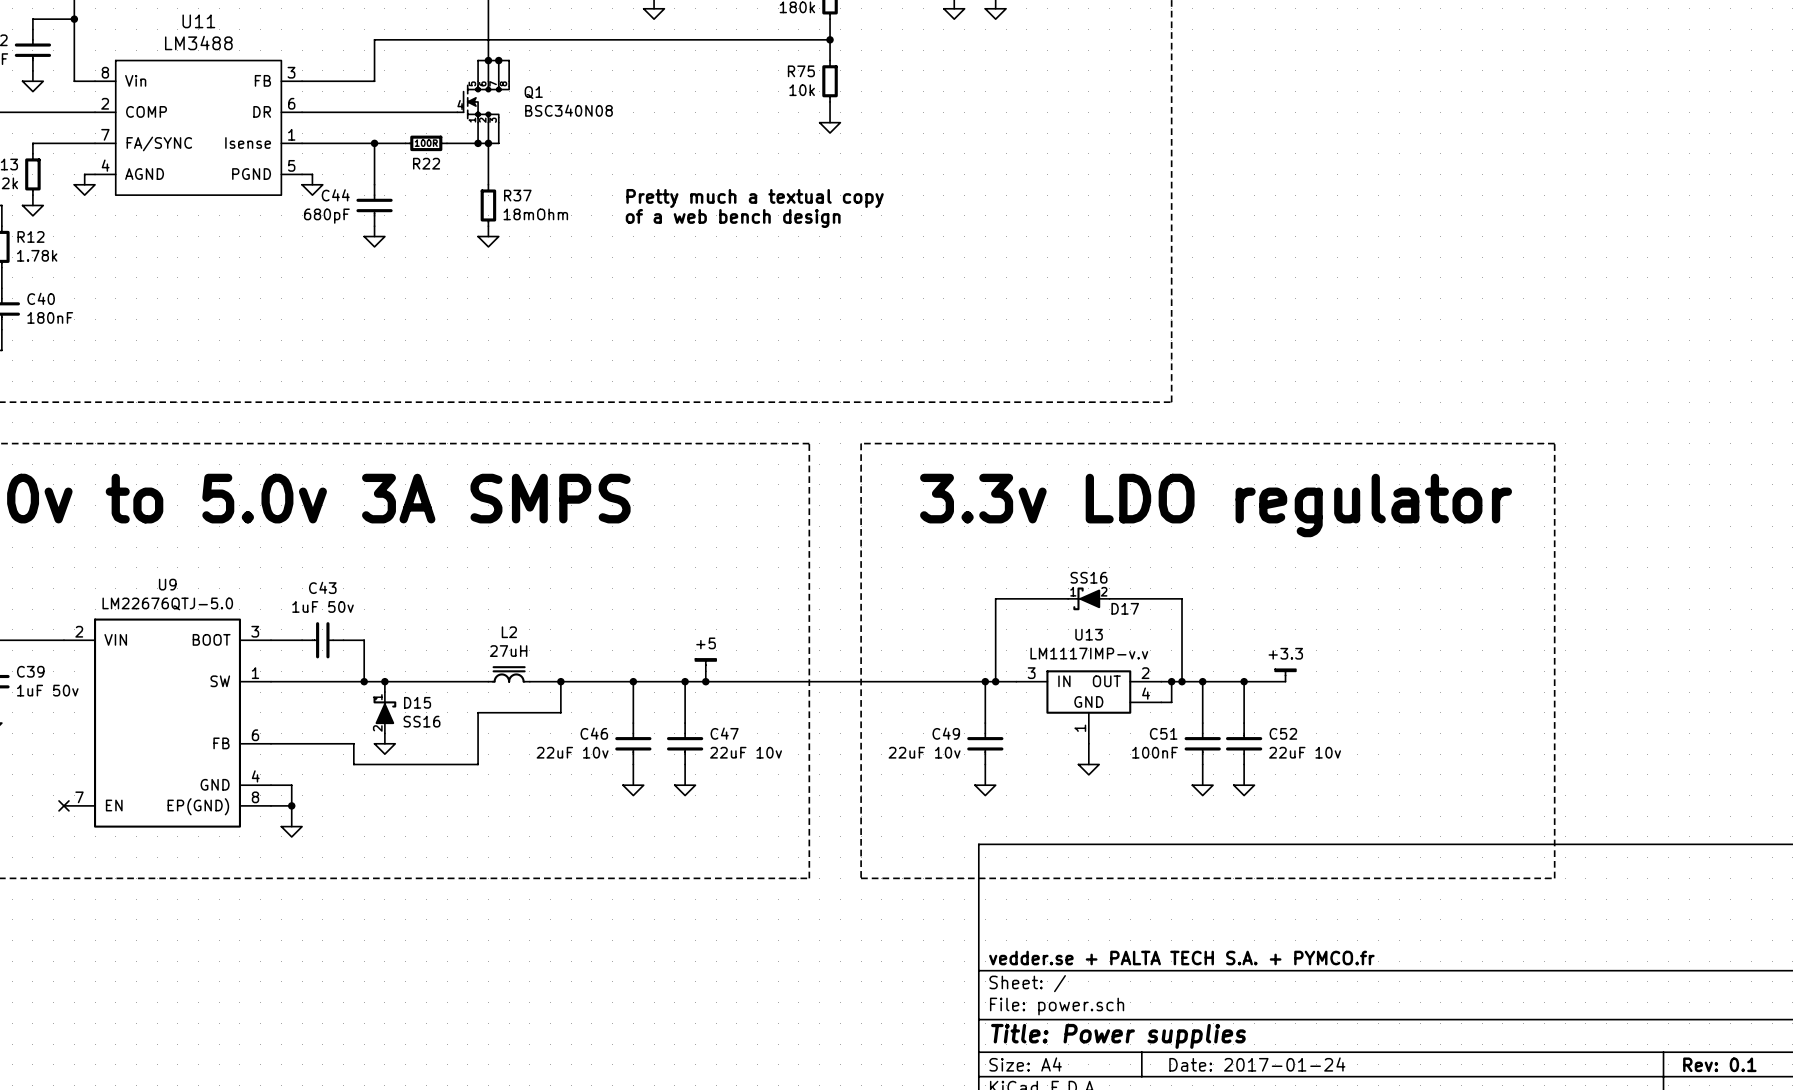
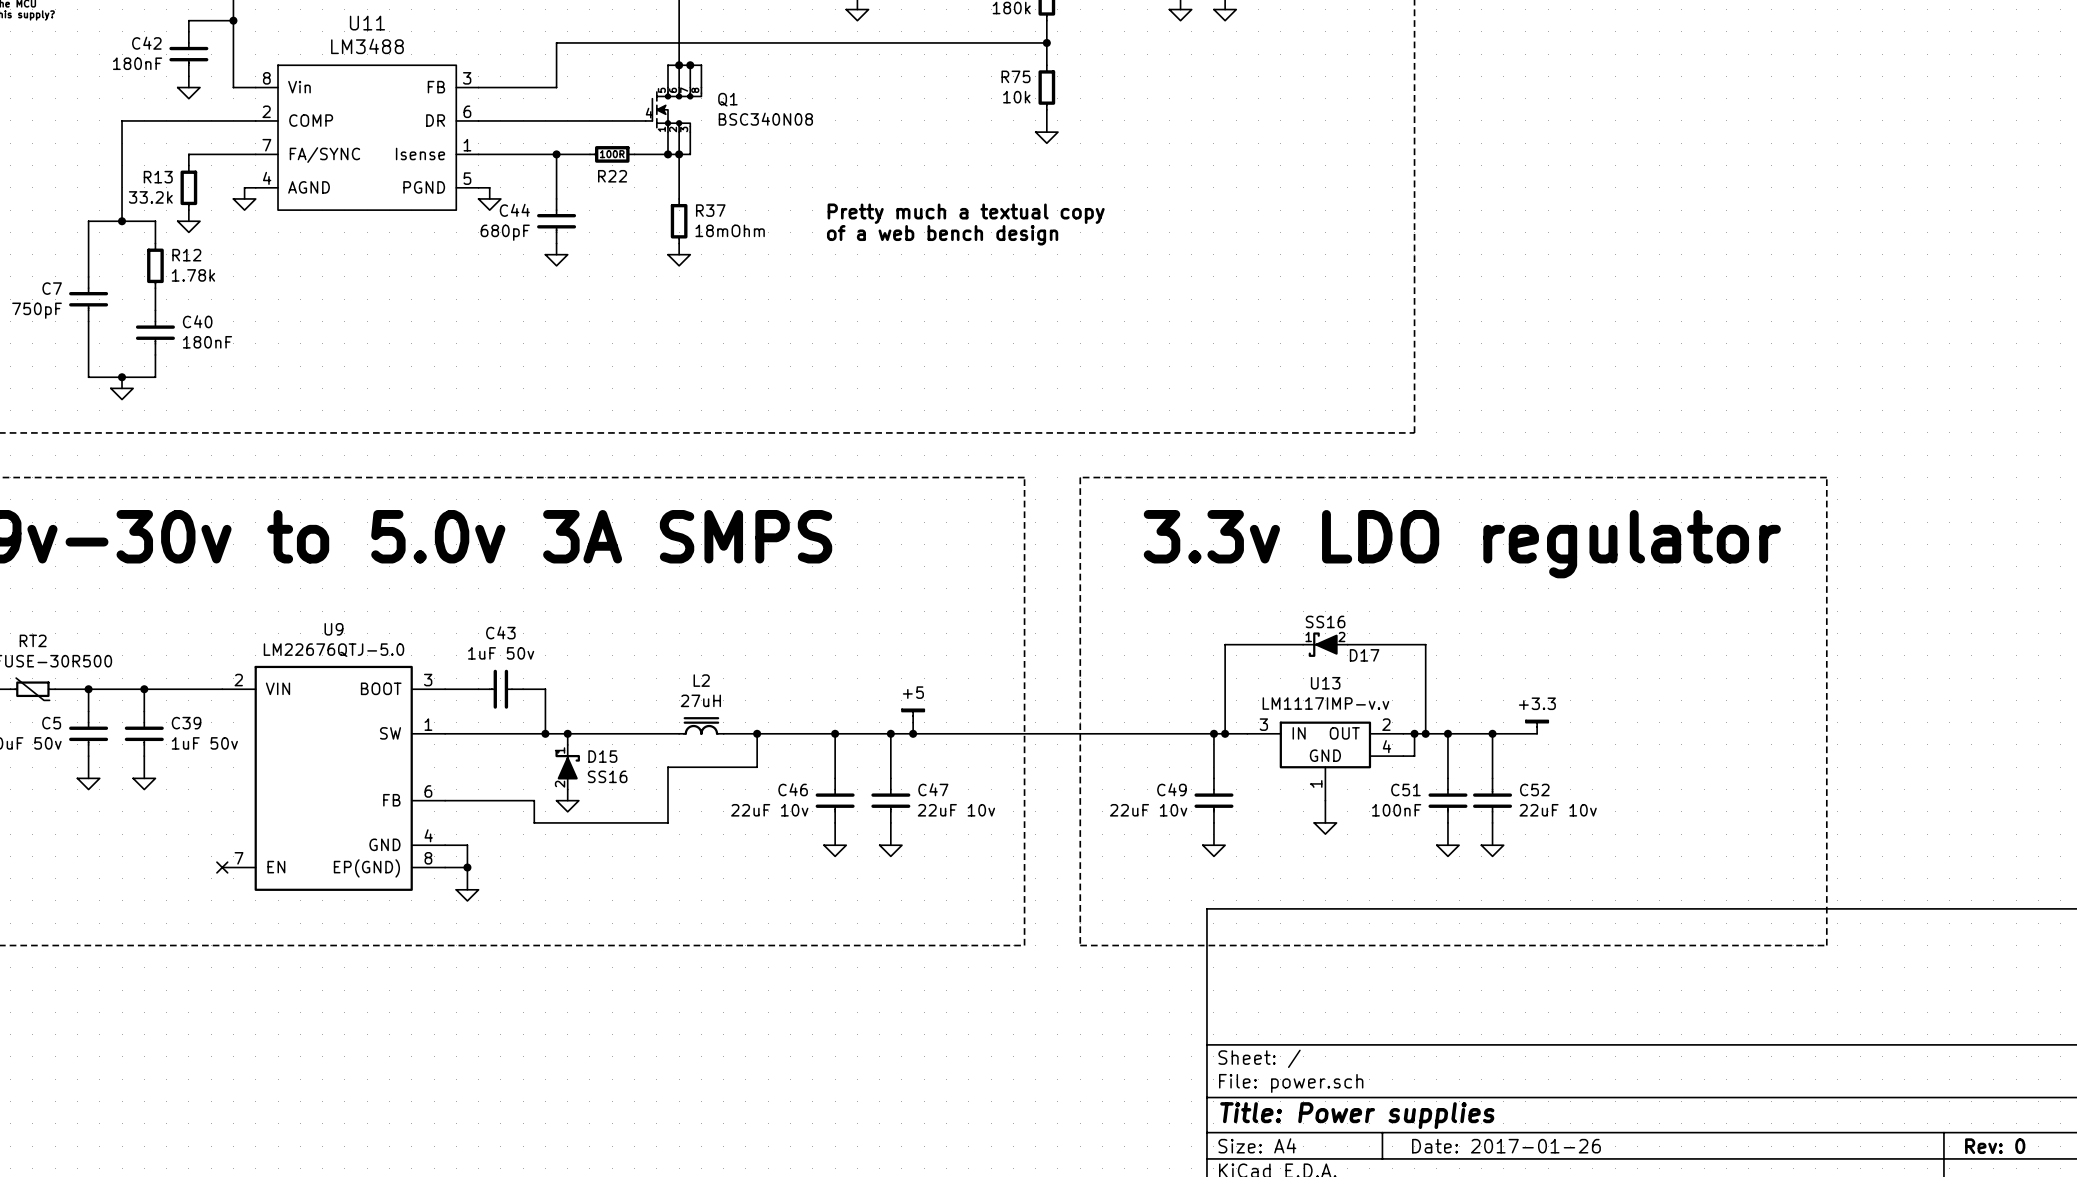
title block: vedder.se + PALTA TECH S.A. + PYMCO.fr (1181, 958) -> none
title block: Date: 2017-01-24 (1257, 1064) -> Date: 2017-01-26 (1506, 1146)
title block: Rev: 0.1 (1719, 1064) -> Rev: 0 (1995, 1146)

